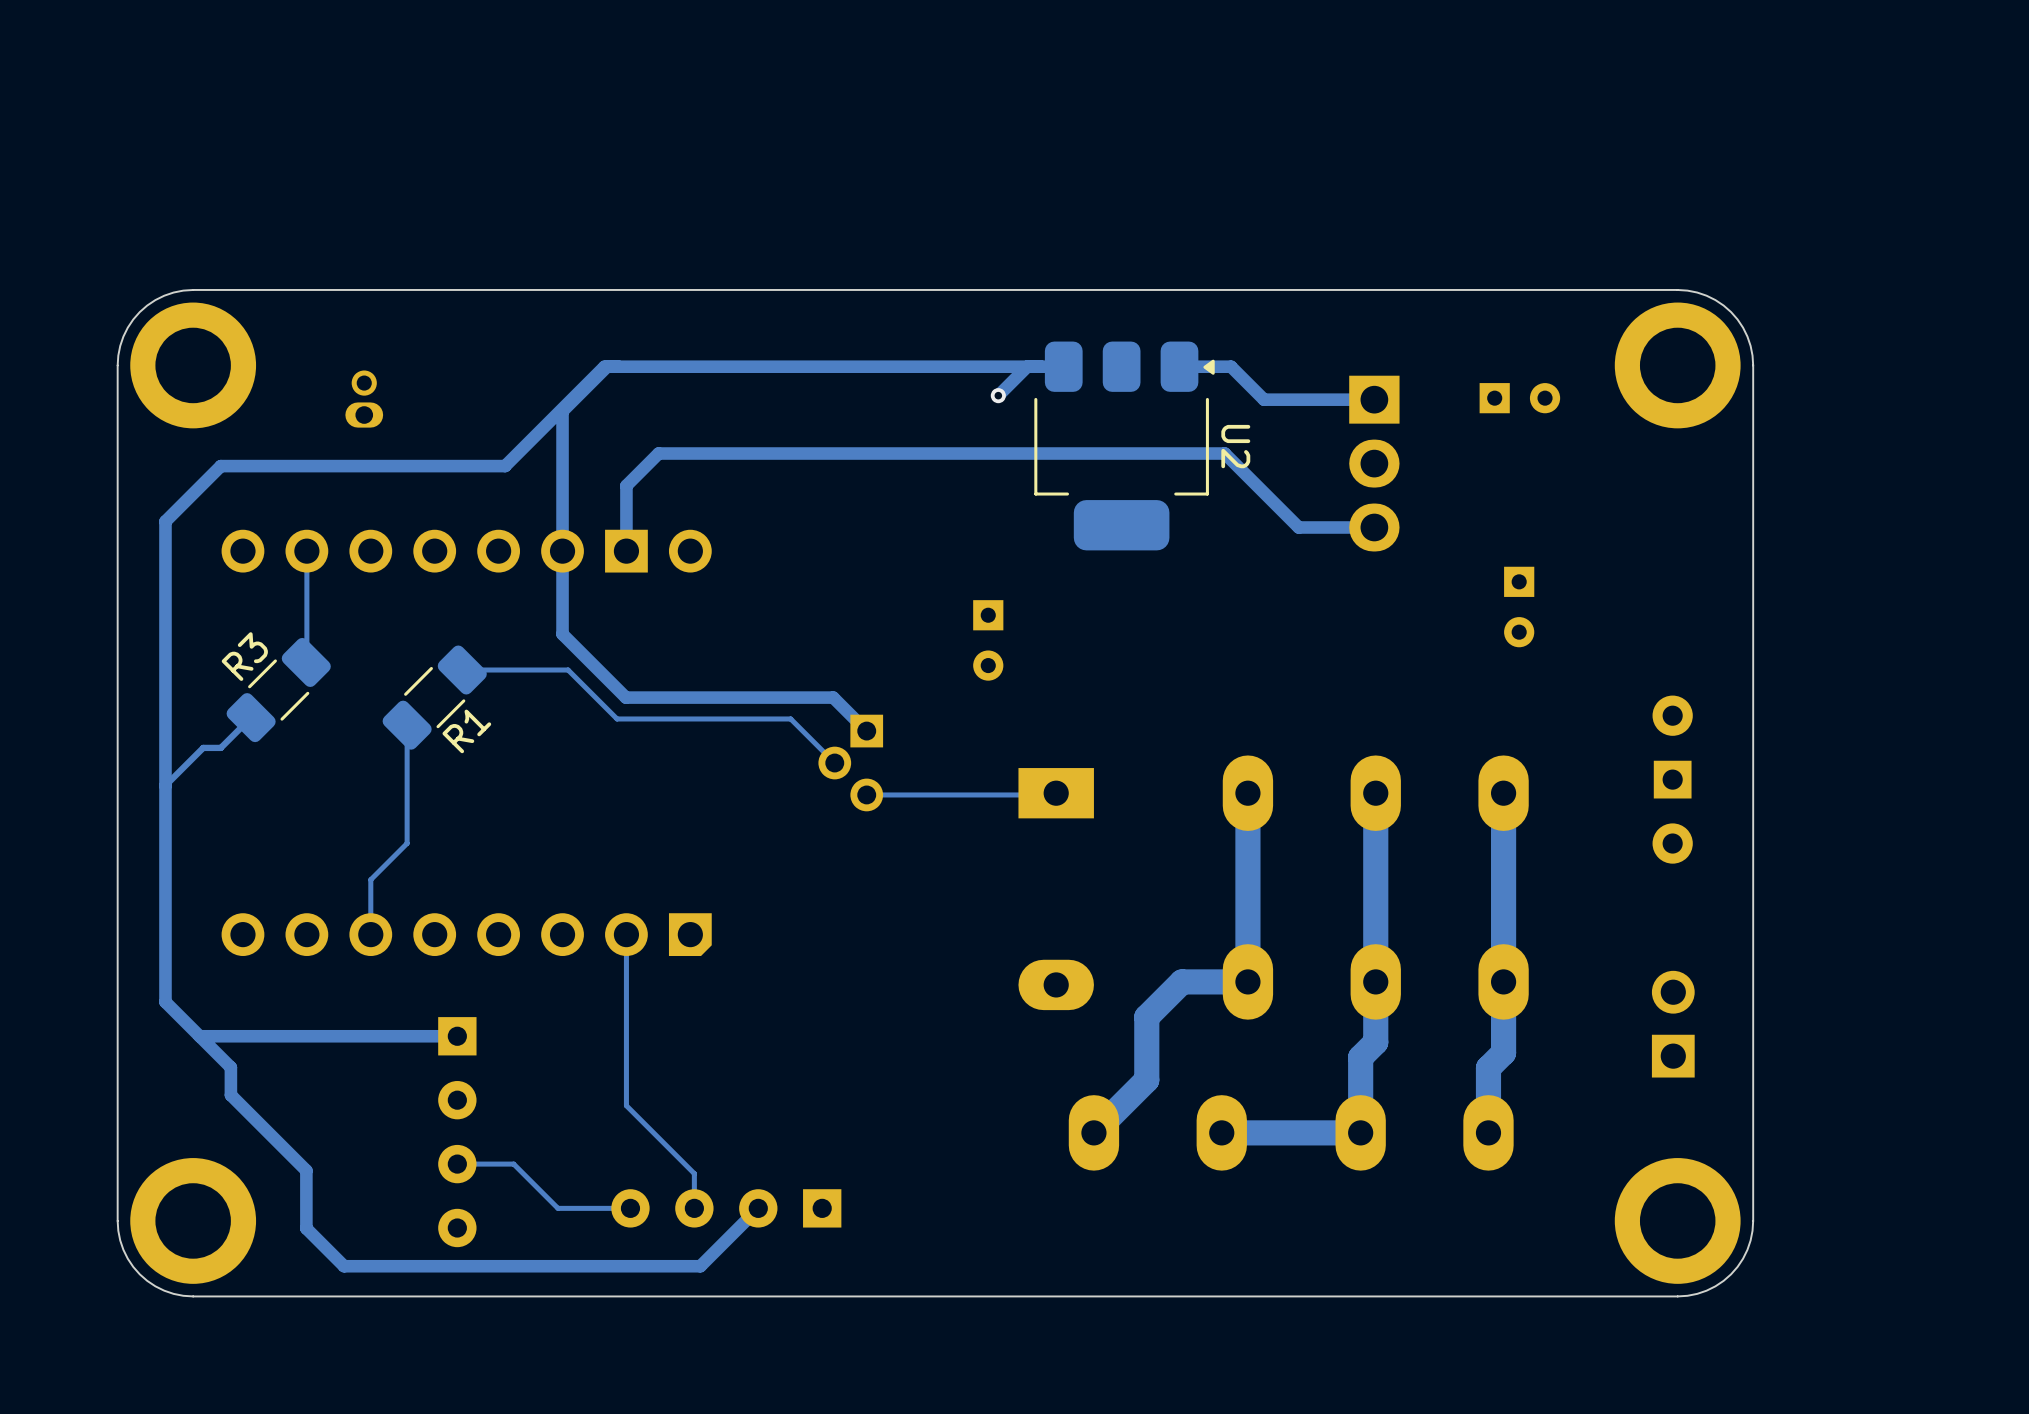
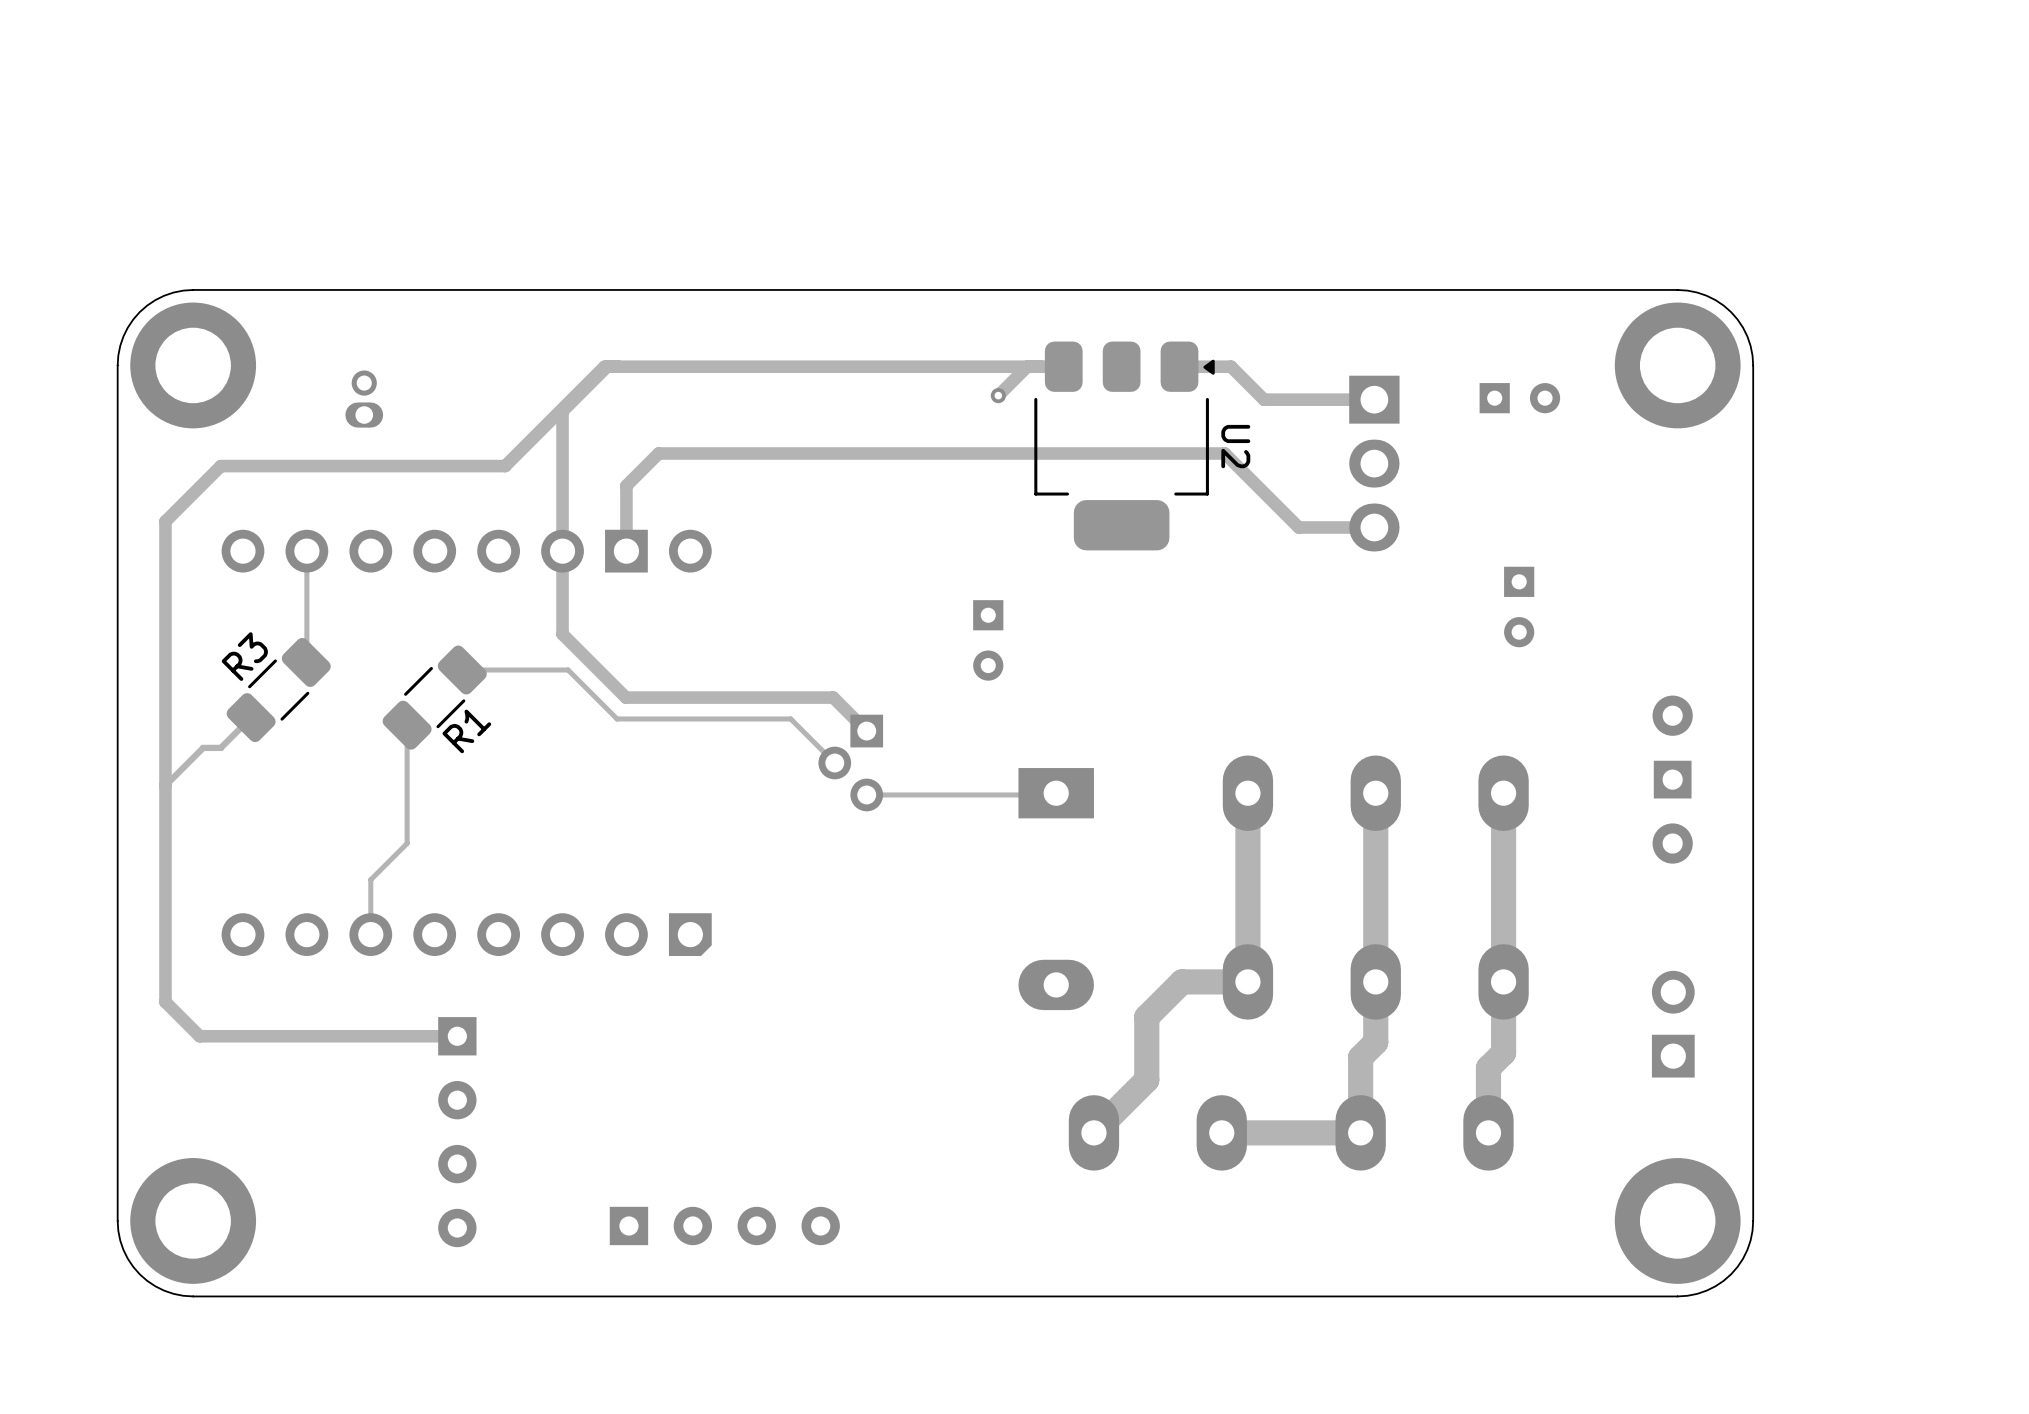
track: (626, 934) (626, 1105) (694, 1173) (694, 1208) -> none
track: (199, 1036) (230, 1067) (230, 1095) (306, 1170) (306, 1228) (344, 1266) (700, 1266) (758, 1208) -> none
track: (457, 1164) (513, 1164) (558, 1208) (630, 1208) -> none
part rotation: 0° (726, 1208) -> 180° (724, 1225)

